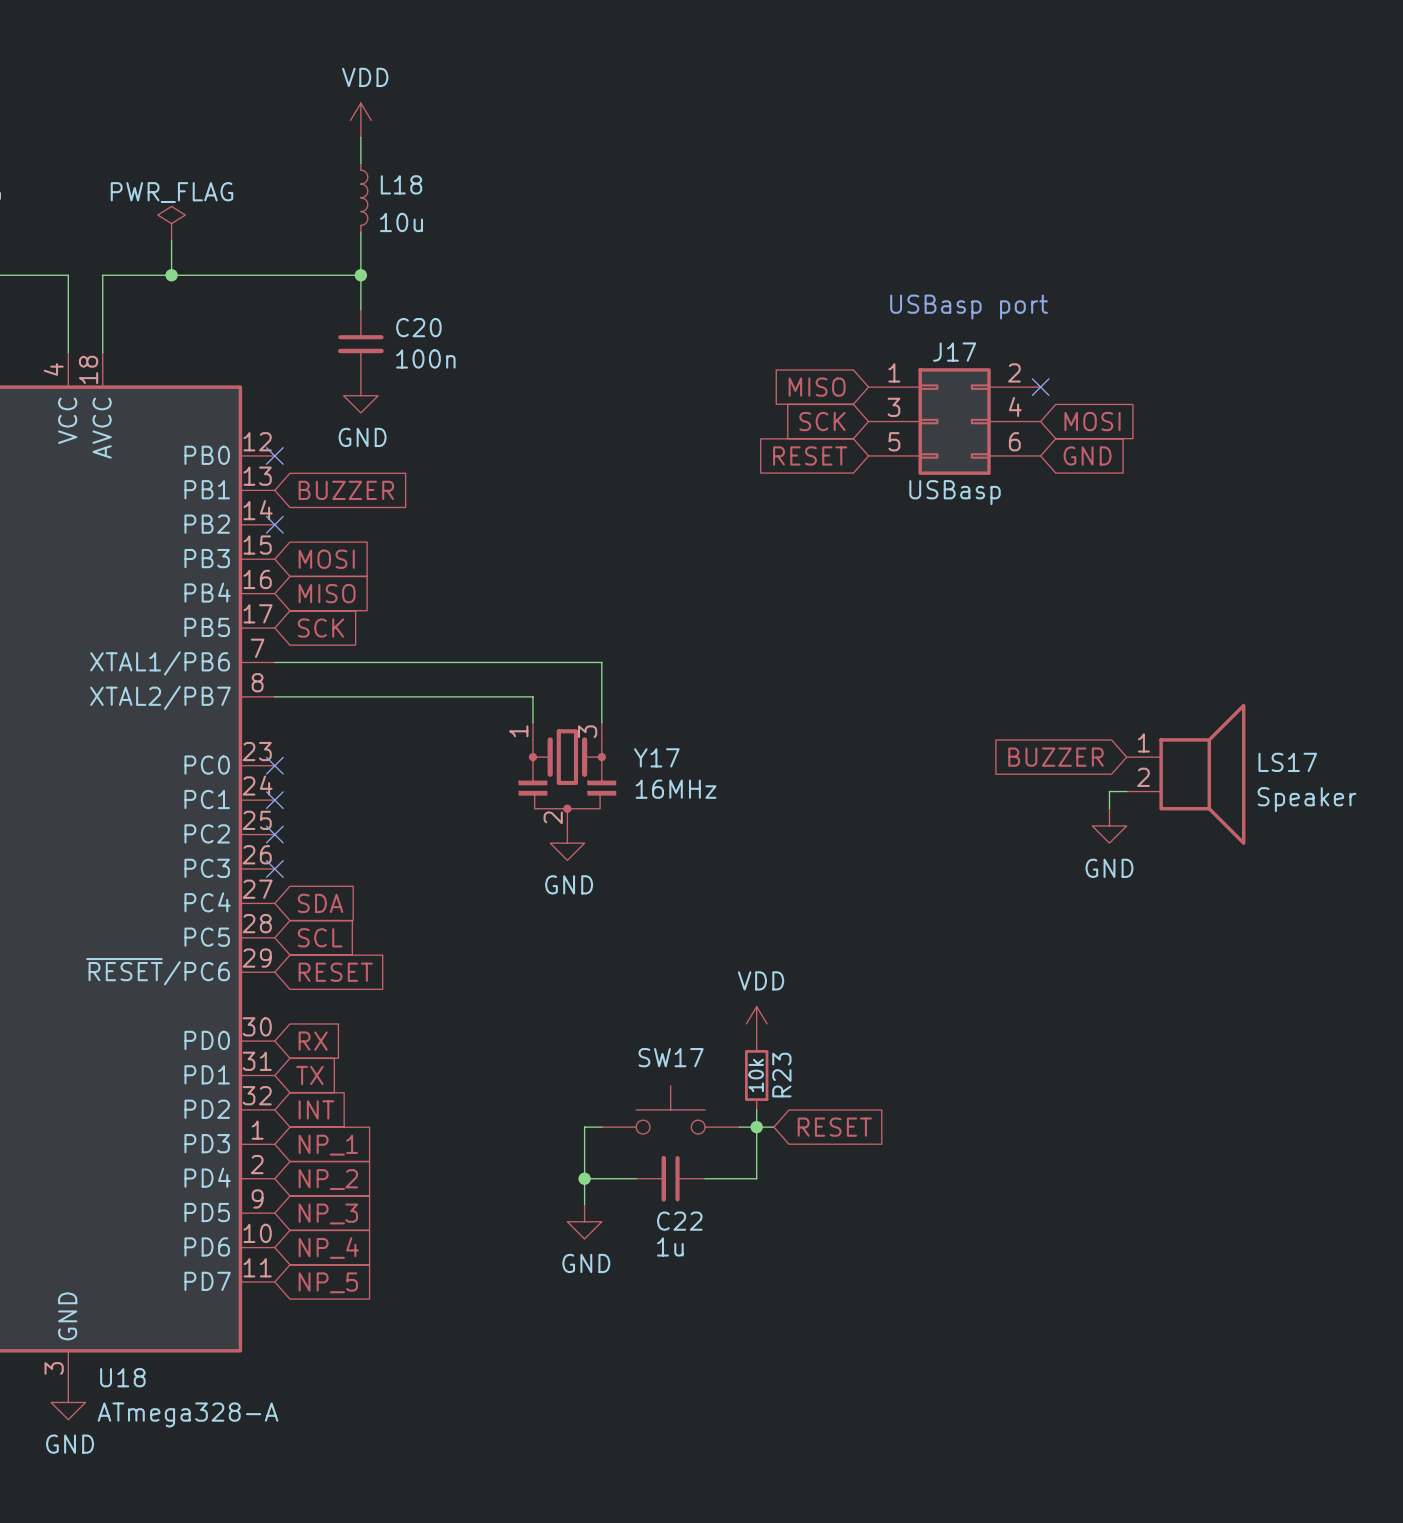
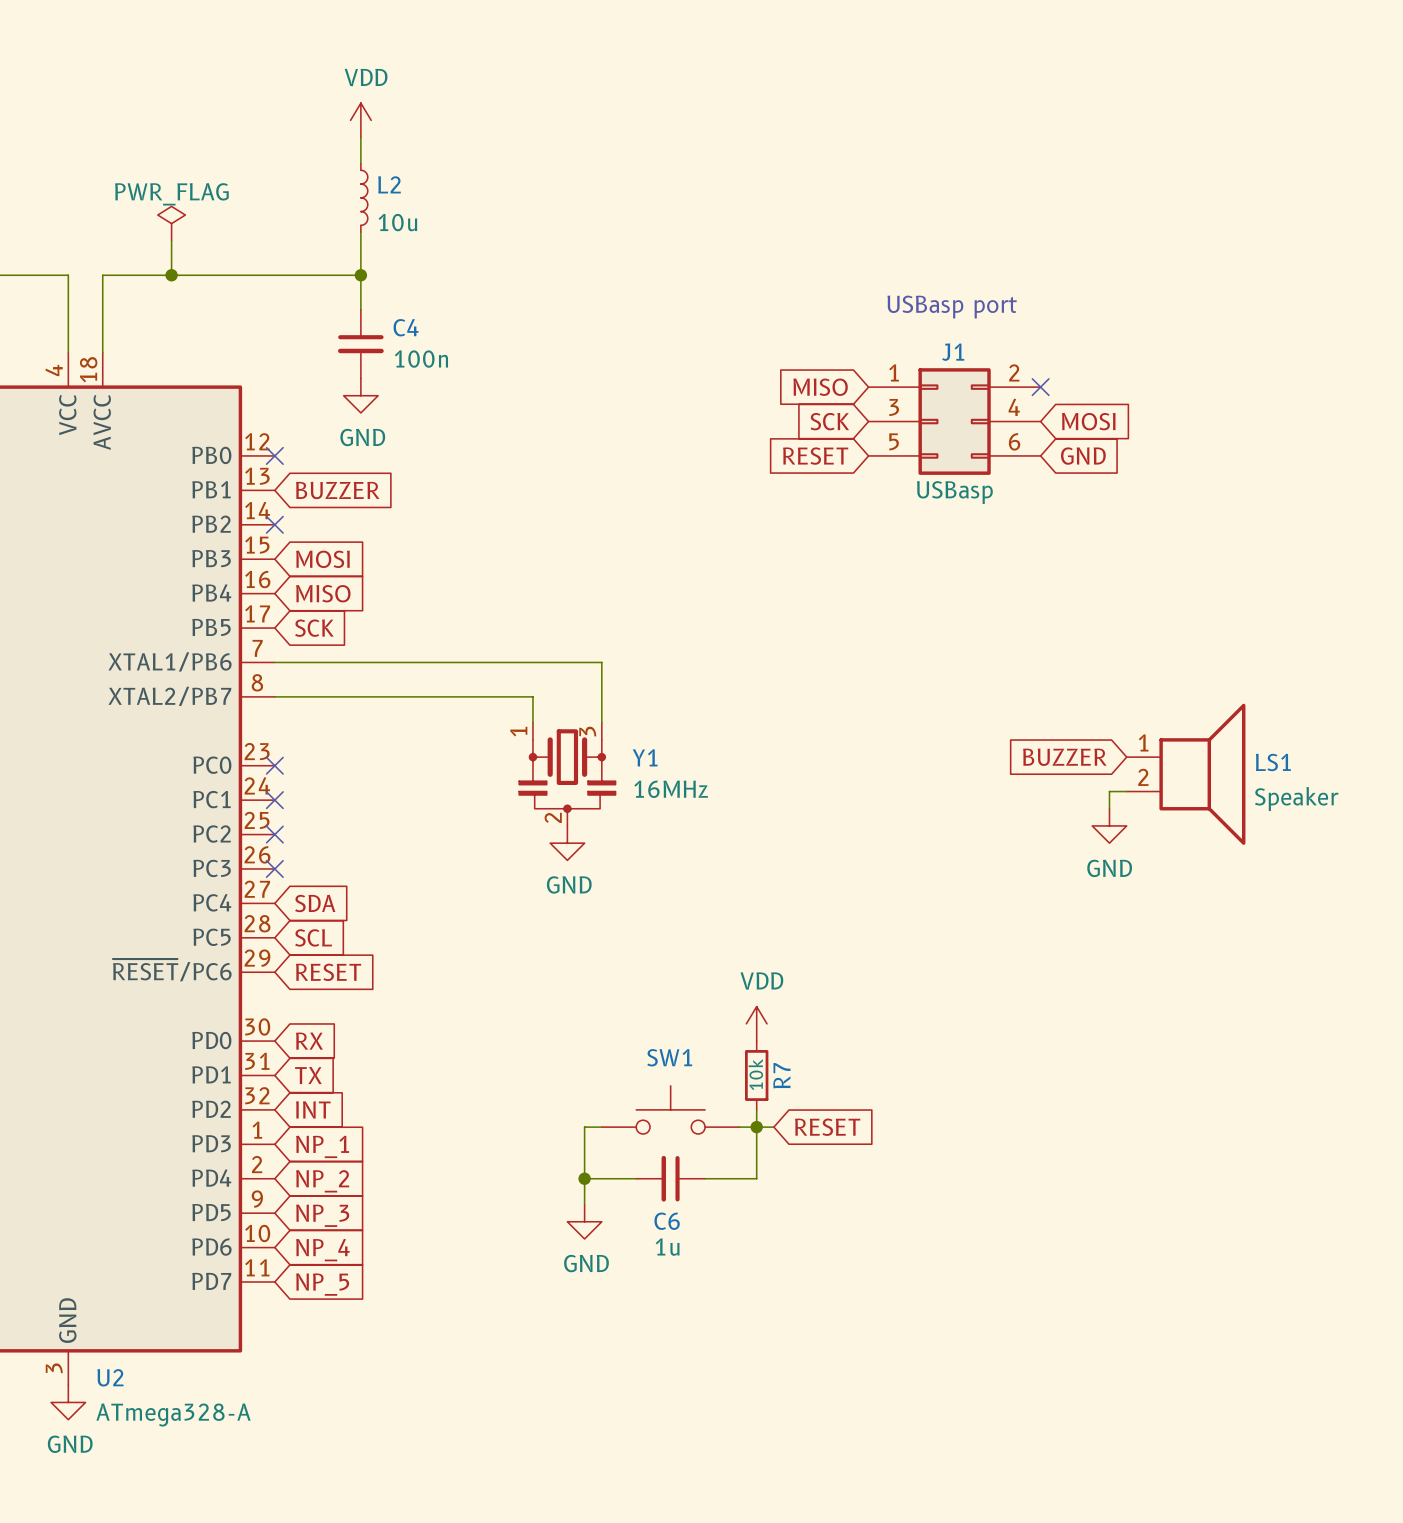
L18 name: L18 (401, 184) -> L2 (389, 184)
C20 name: C20 (418, 327) -> C4 (406, 327)
J17 name: J17 (954, 352) -> J1 (953, 352)
Y17 name: Y17 (656, 757) -> Y1 (645, 757)
LS17 name: LS17 (1287, 762) -> LS1 (1273, 762)
SW17 name: SW17 (671, 1057) -> SW1 (669, 1057)
R23 name: R23 (781, 1075) -> R7 (781, 1075)
C22 name: C22 (679, 1221) -> C6 (667, 1221)
U18 name: U18 (122, 1377) -> U2 (110, 1377)

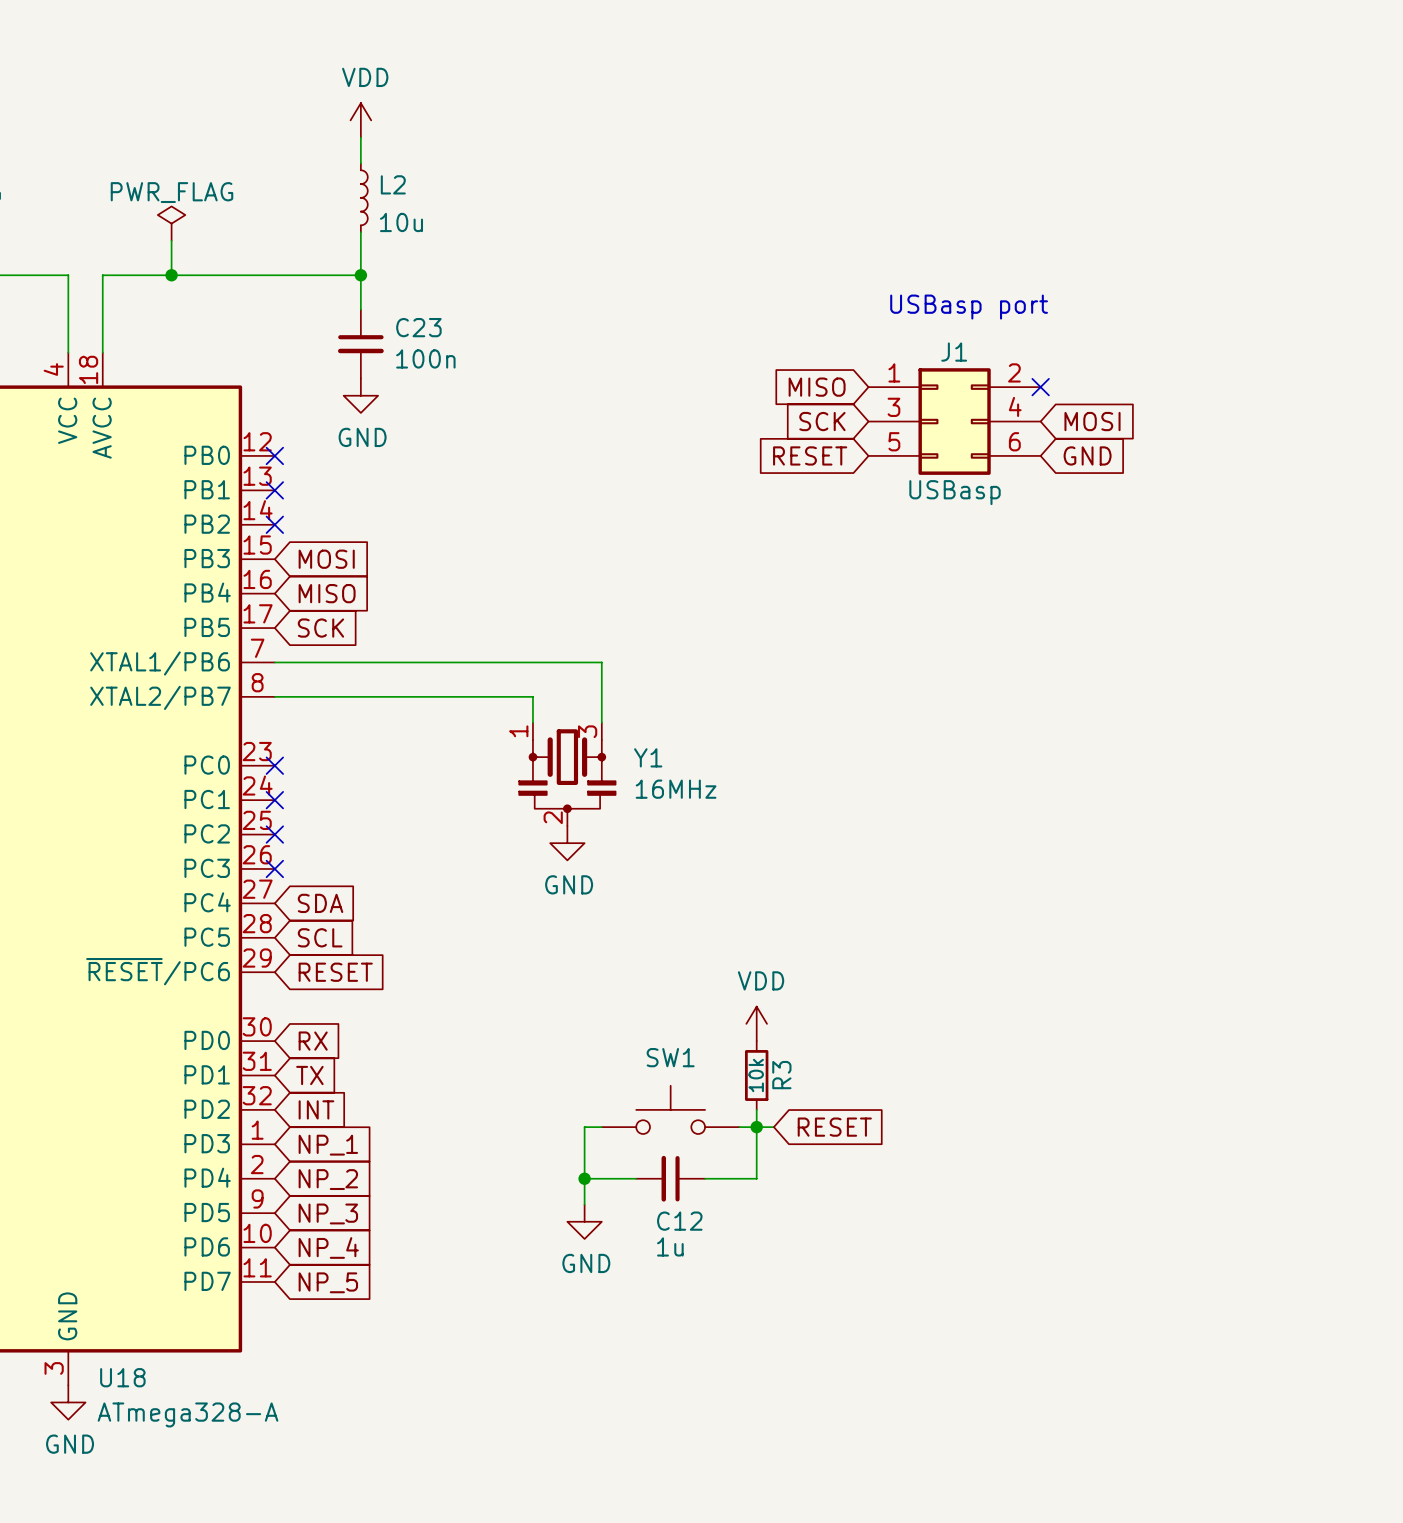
C4 name: C4 (406, 327) -> C23 (418, 327)
no-connect mark: none -> (274, 490)
global label: BUZZER (337, 490) -> none
global label: BUZZER (1064, 757) -> none
LS1: Speaker (1186, 774) -> none
wire: (1126, 791) (1109, 791) (1109, 808) -> none
power symbol: GND (1109, 825) -> none
R7 name: R7 (781, 1075) -> R3 (781, 1075)
C6 name: C6 (667, 1221) -> C12 (679, 1221)
U2 name: U2 (110, 1377) -> U18 (122, 1377)

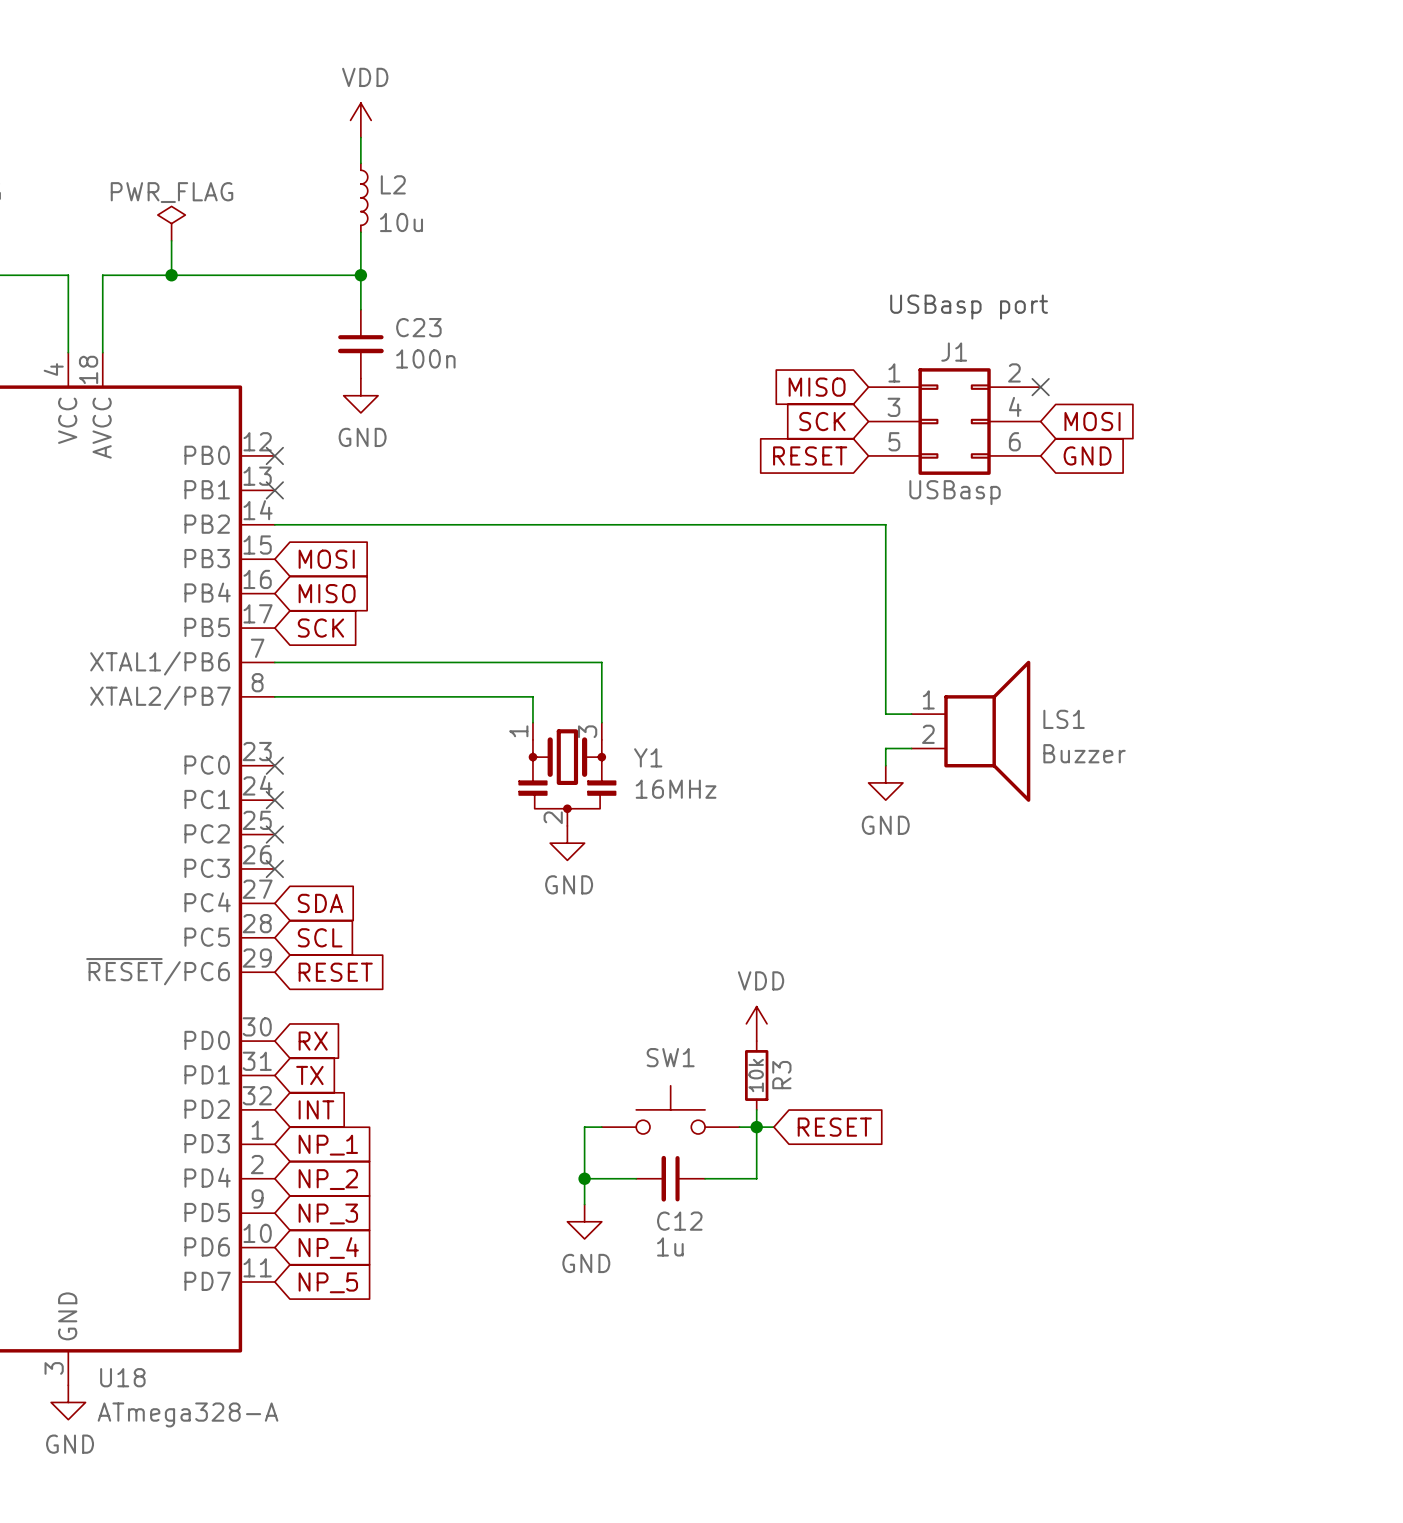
wire: none -> (274, 524) (885, 524) (885, 714) (911, 714)
no-connect mark: (274, 524) -> none
LS1: none -> Buzzer (970, 731)
wire: none -> (911, 748) (885, 748) (885, 765)
power symbol: none -> GND (885, 782)

